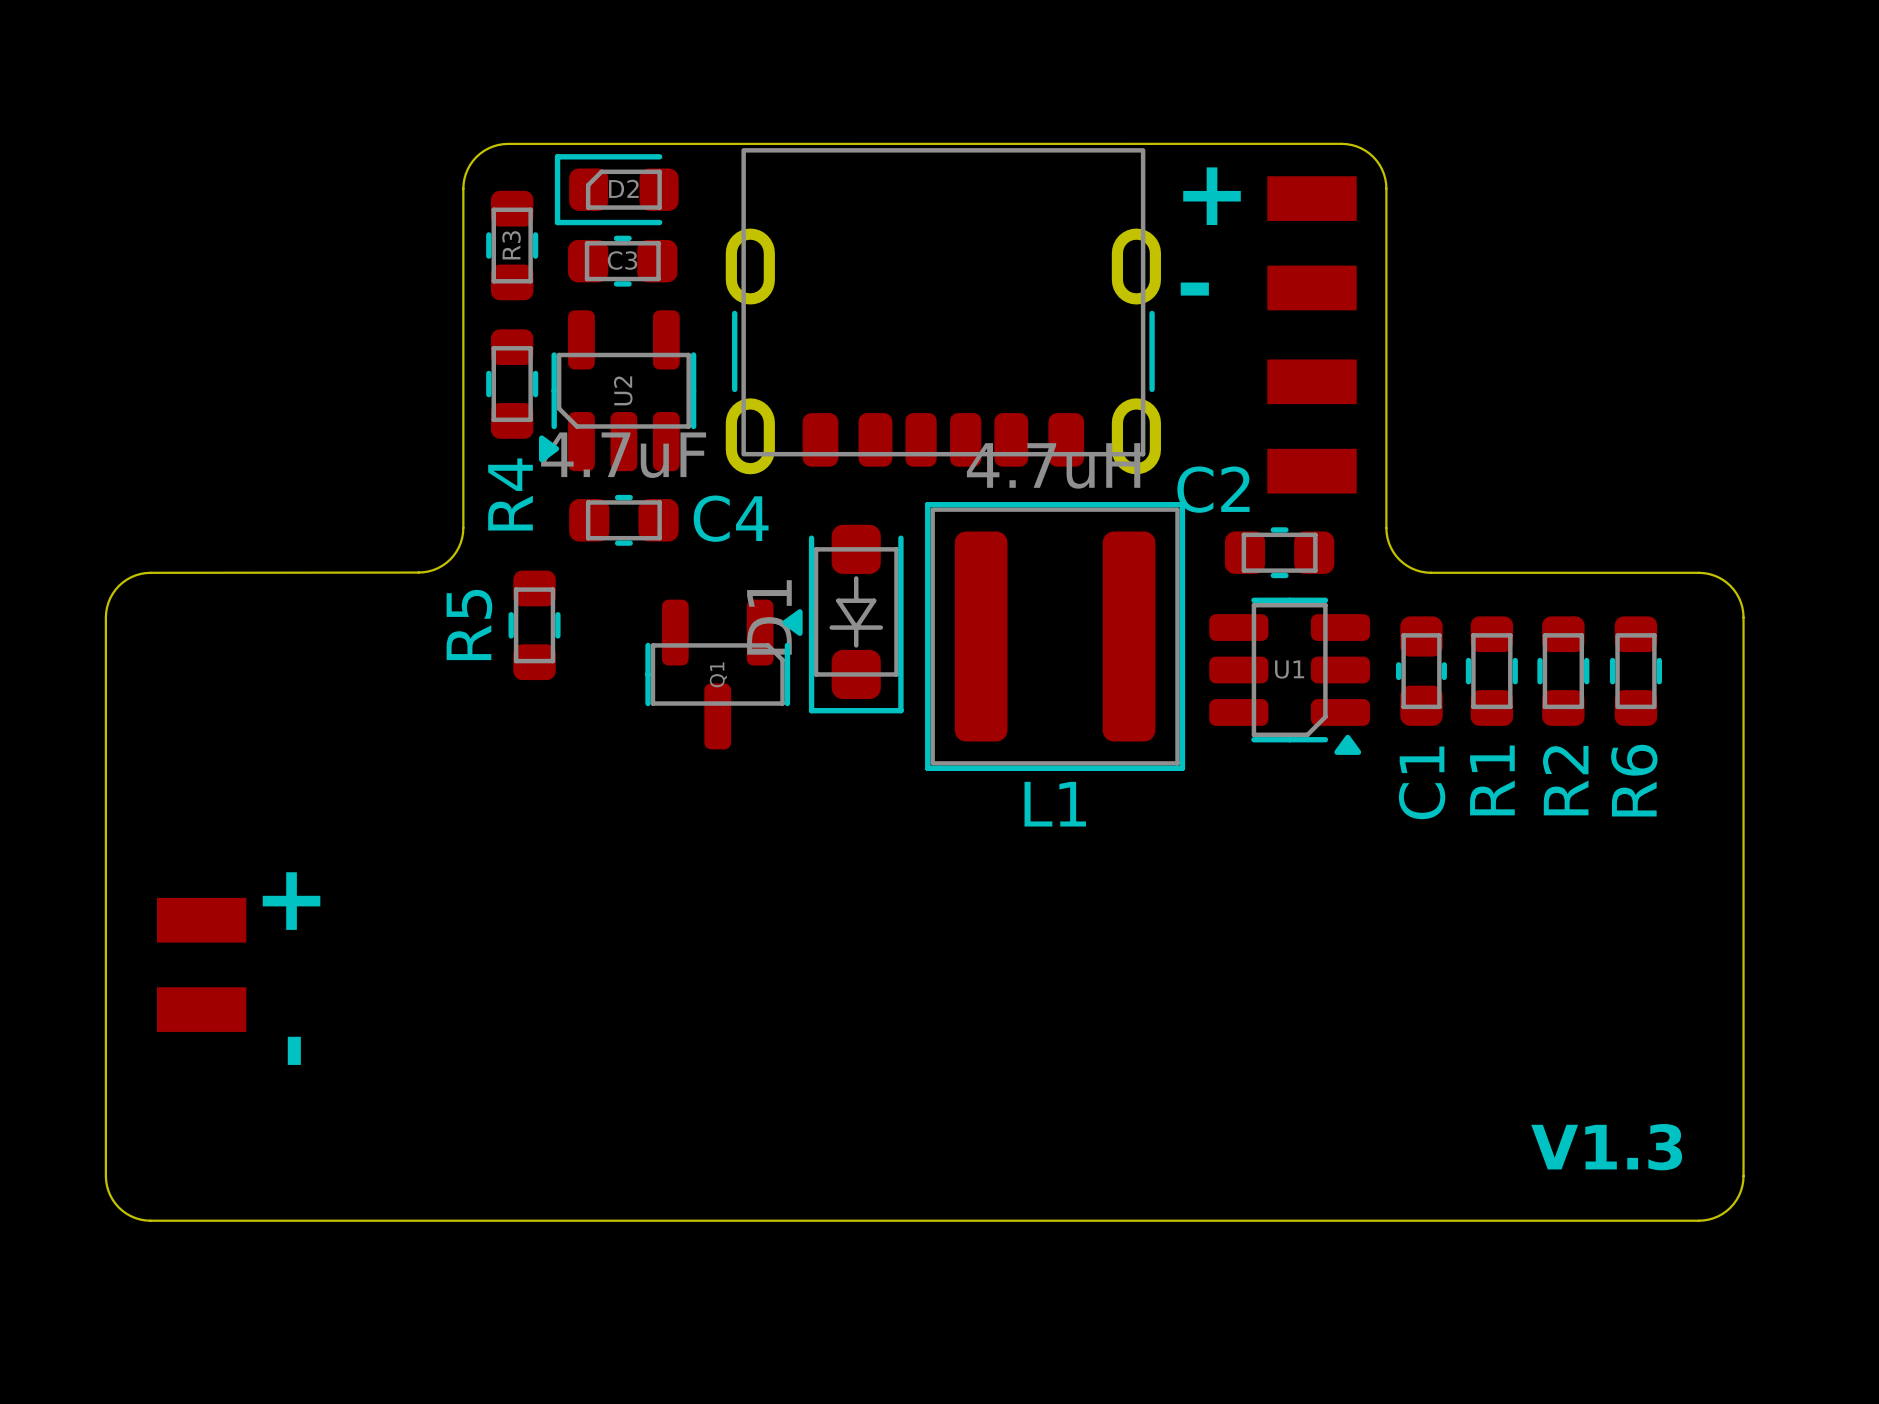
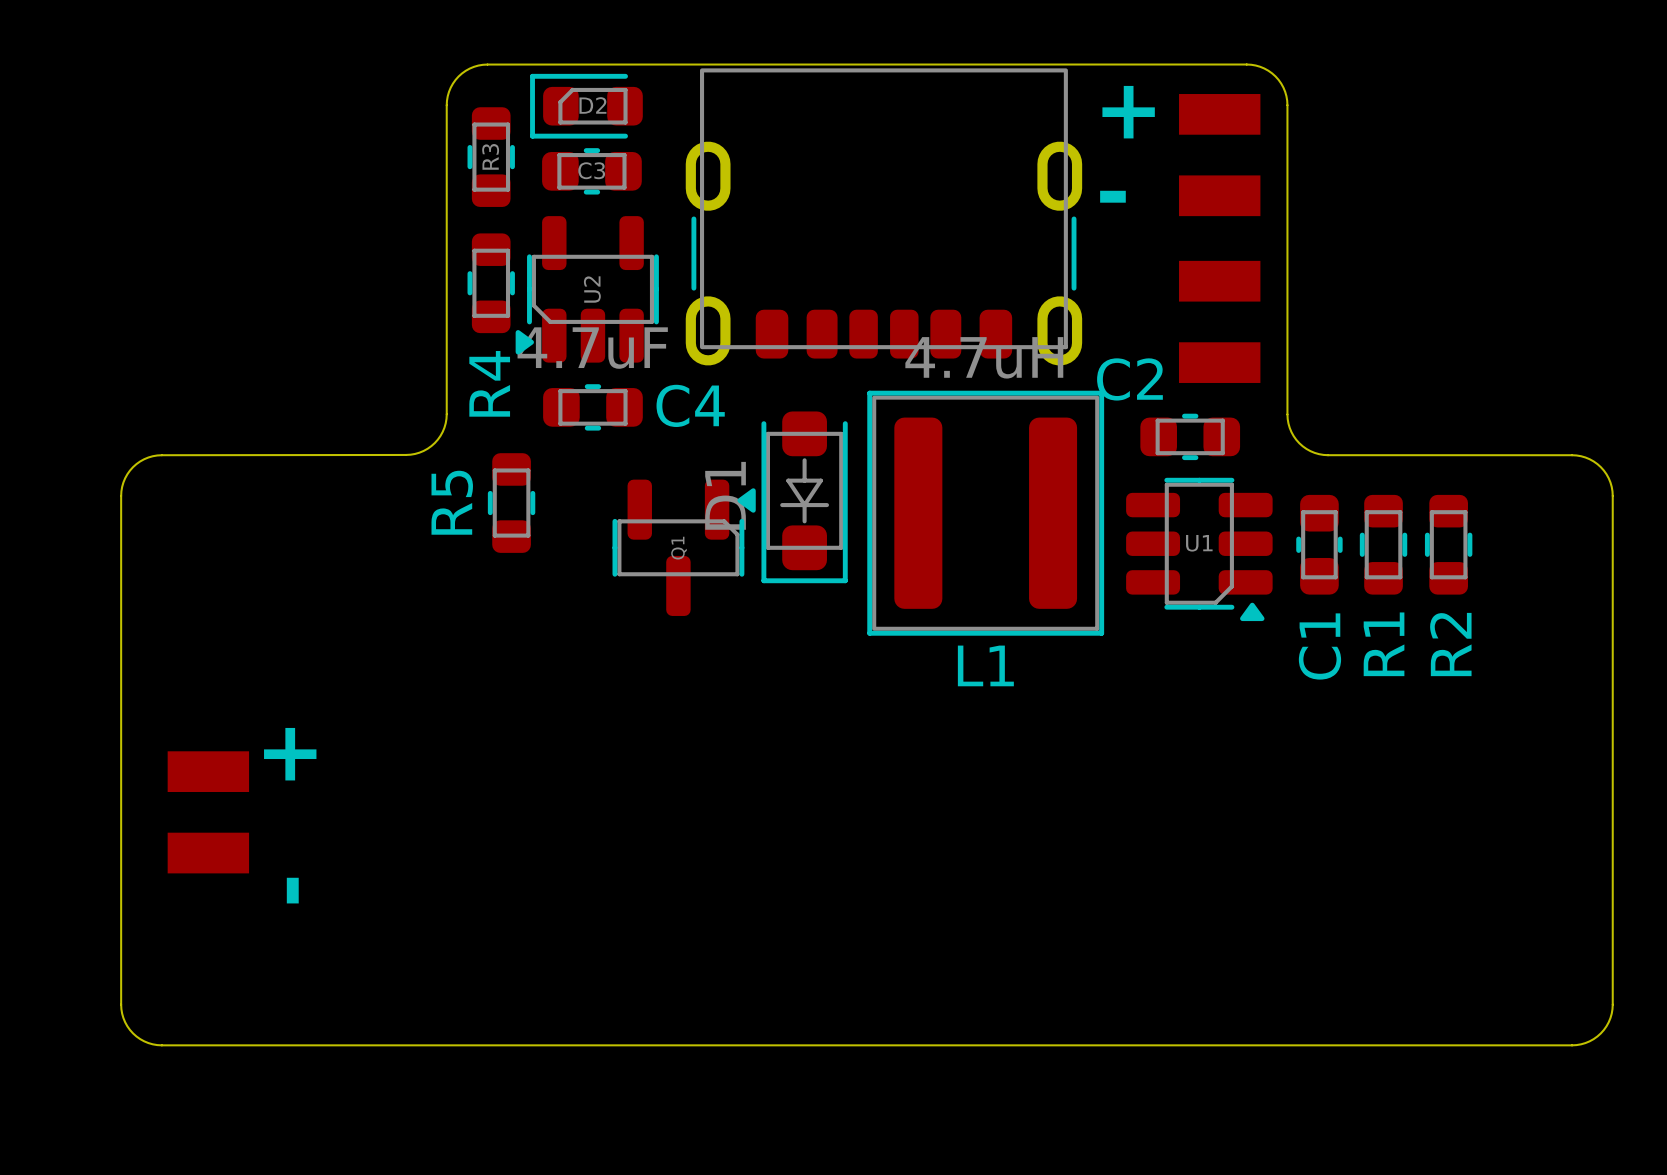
R6: (1635, 671) -> none
text: V1.3 (1606, 1147) -> none

